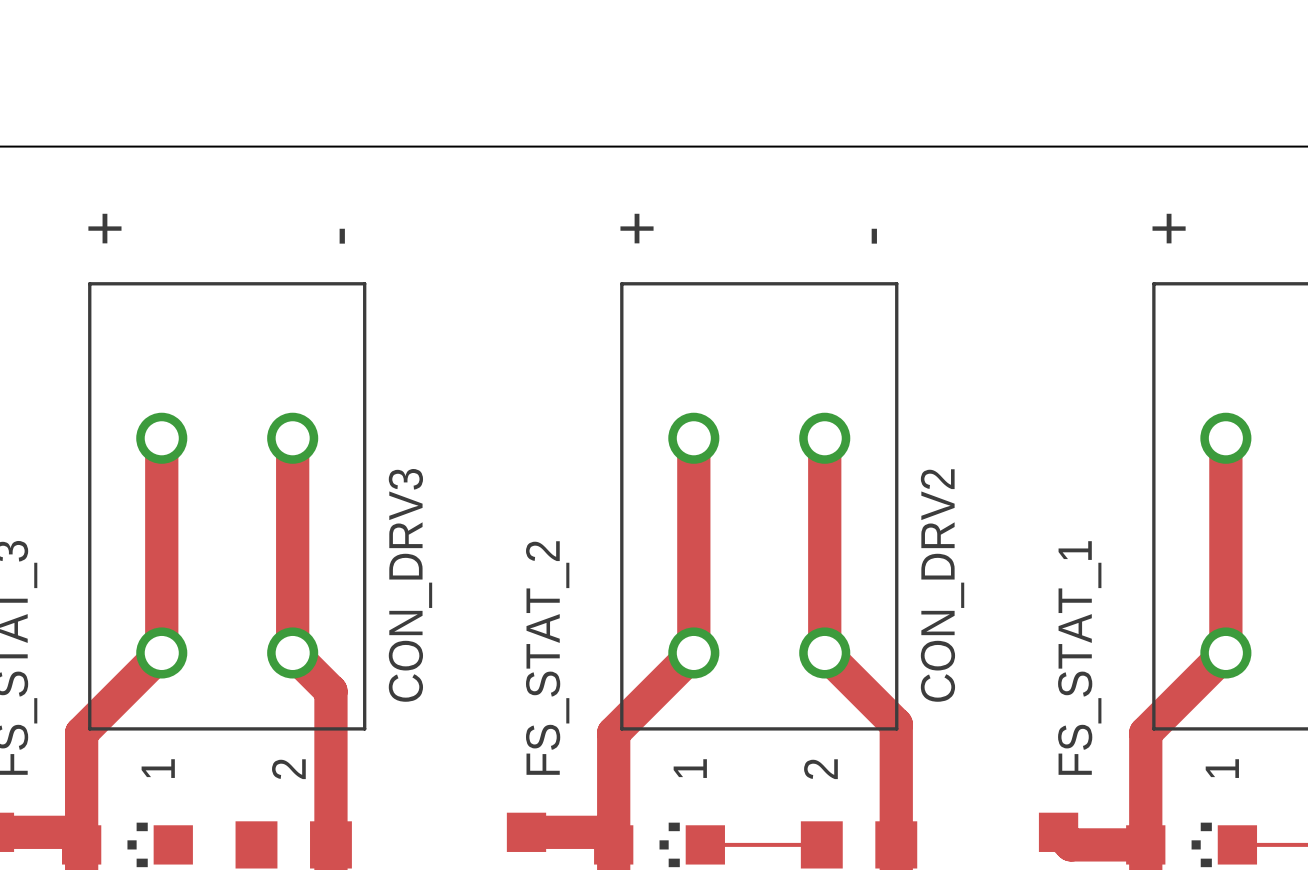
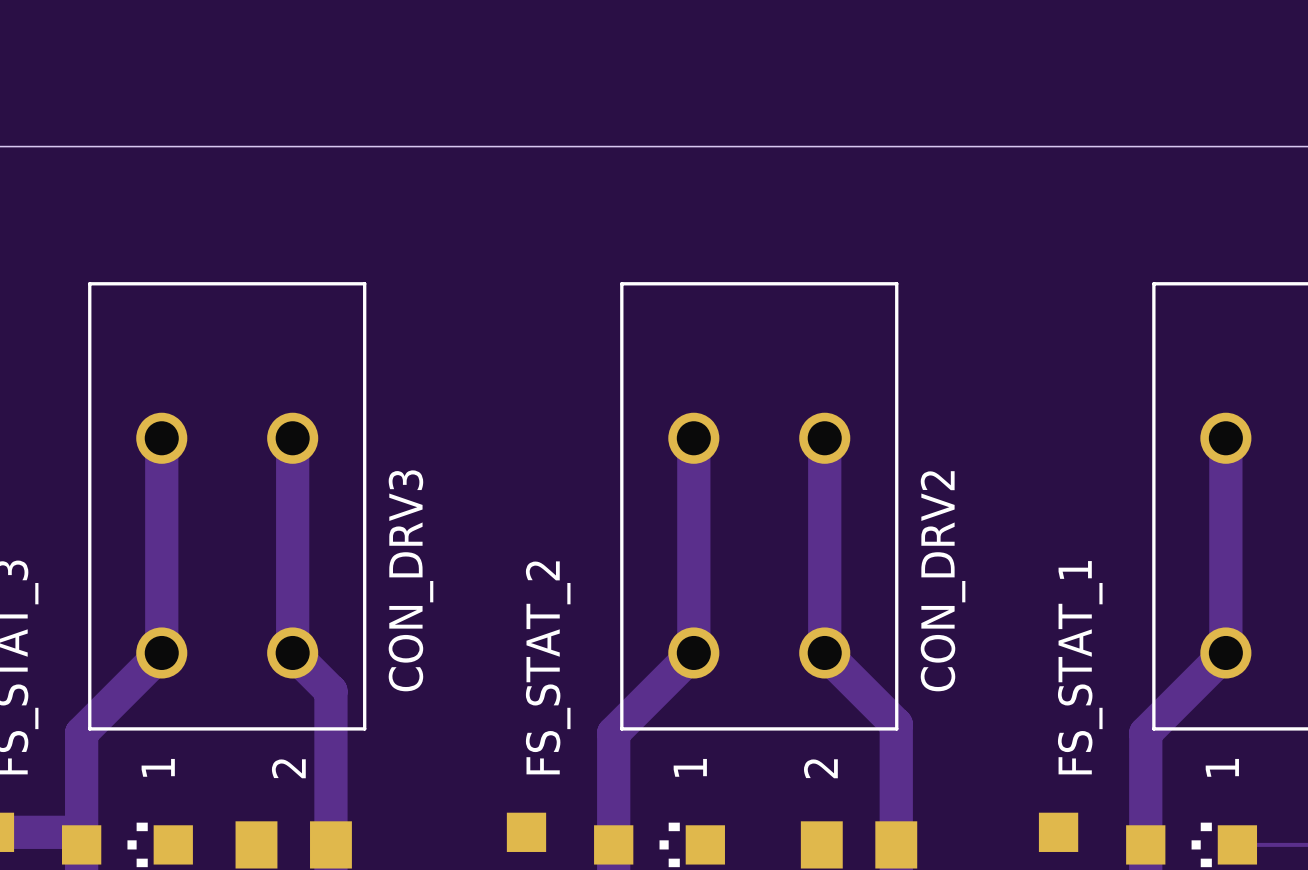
text: + (104, 228) -> none
text: + (637, 228) -> none
text: + (1169, 228) -> none
text: - (342, 236) -> none
text: - (874, 236) -> none
track: (526, 832) (601, 832) (613, 844) -> none
track: (1058, 832) (1071, 844) (1145, 844) -> none
track: (705, 844) (821, 844) -> none

